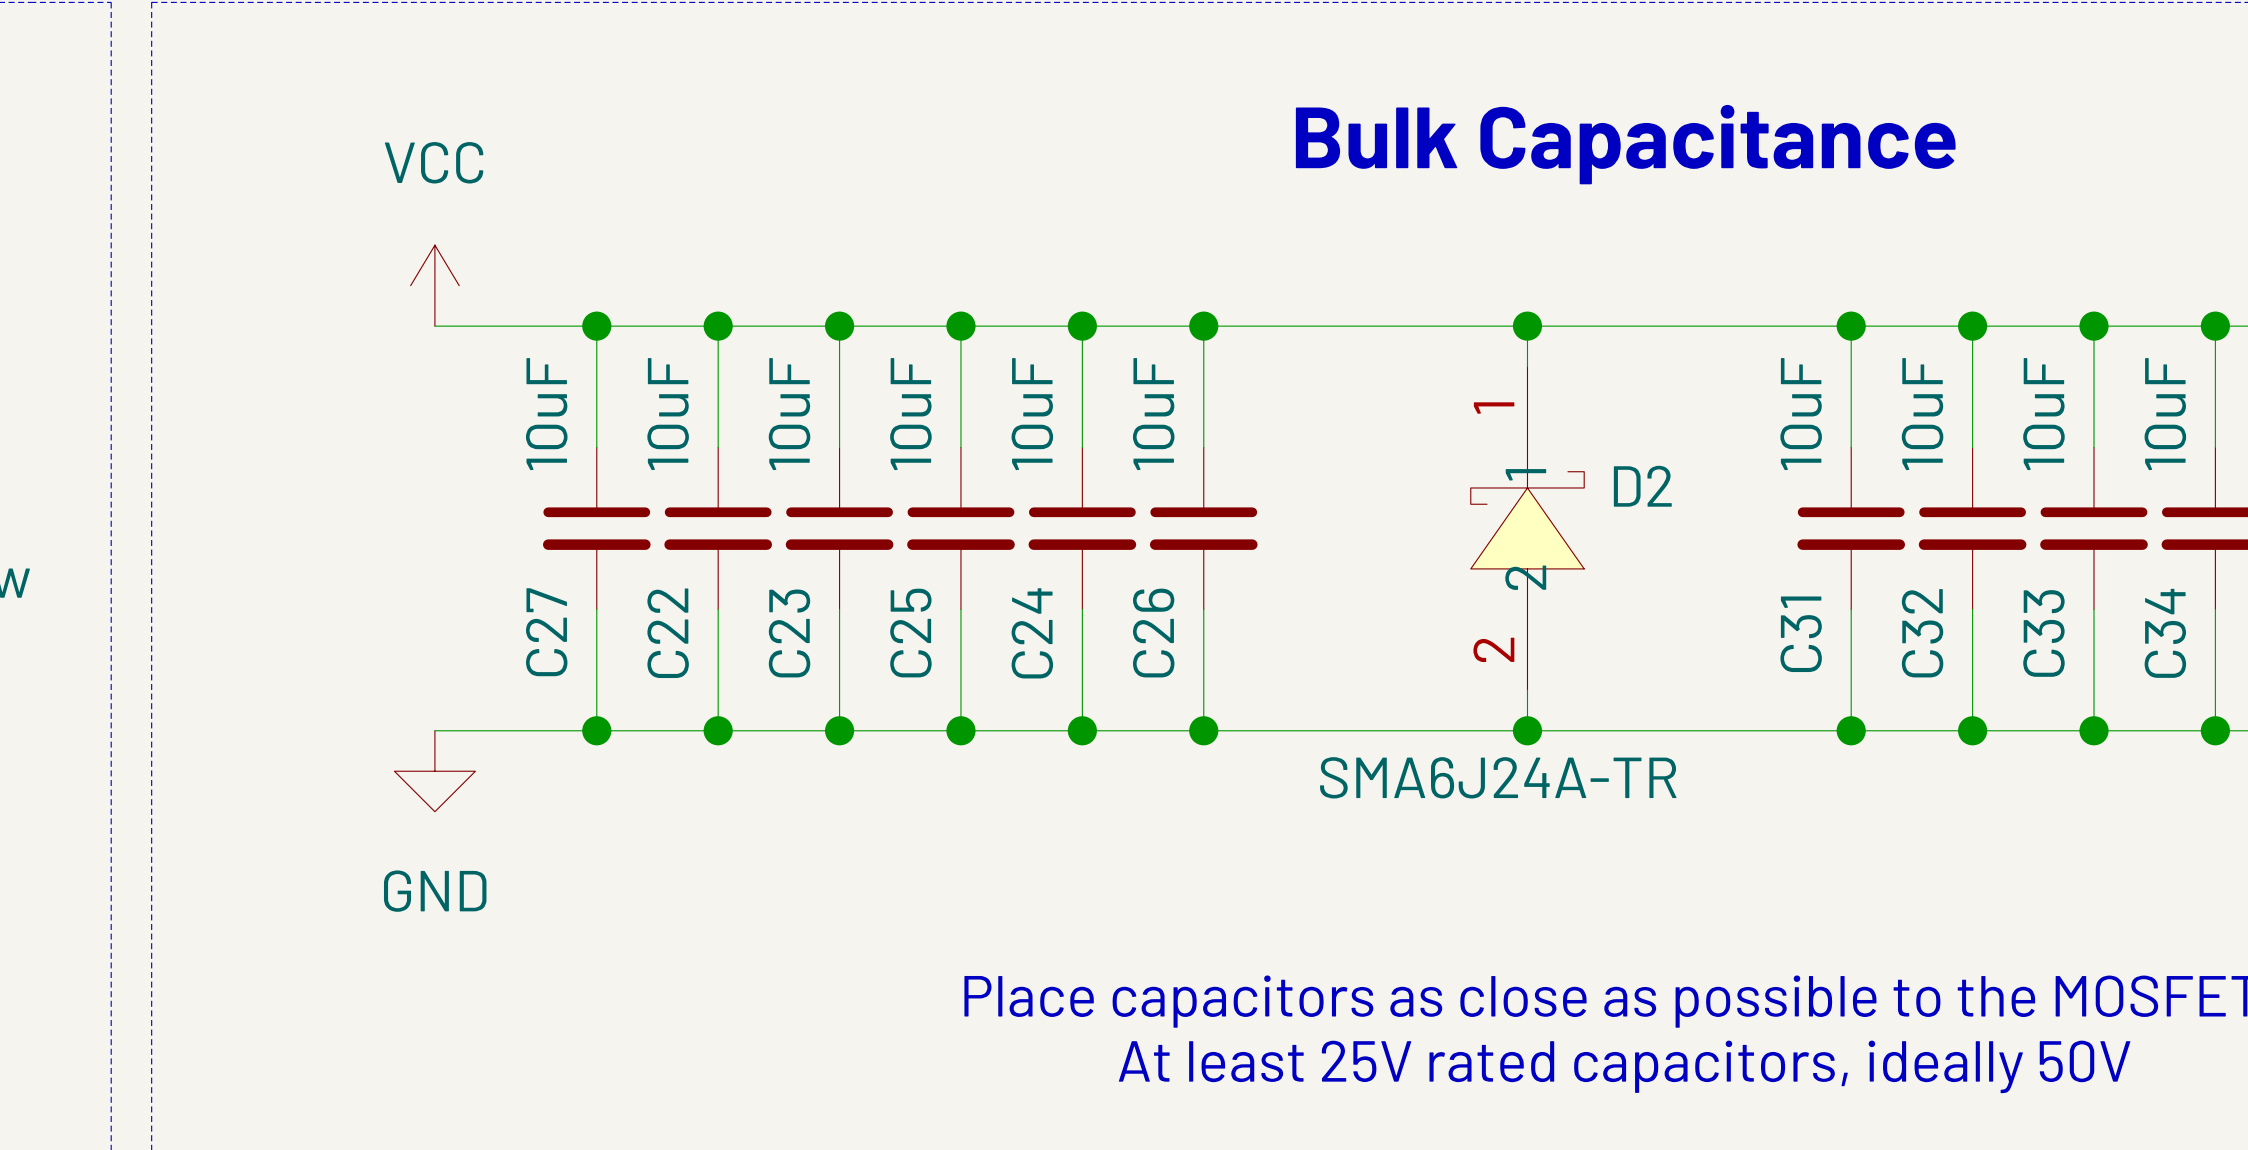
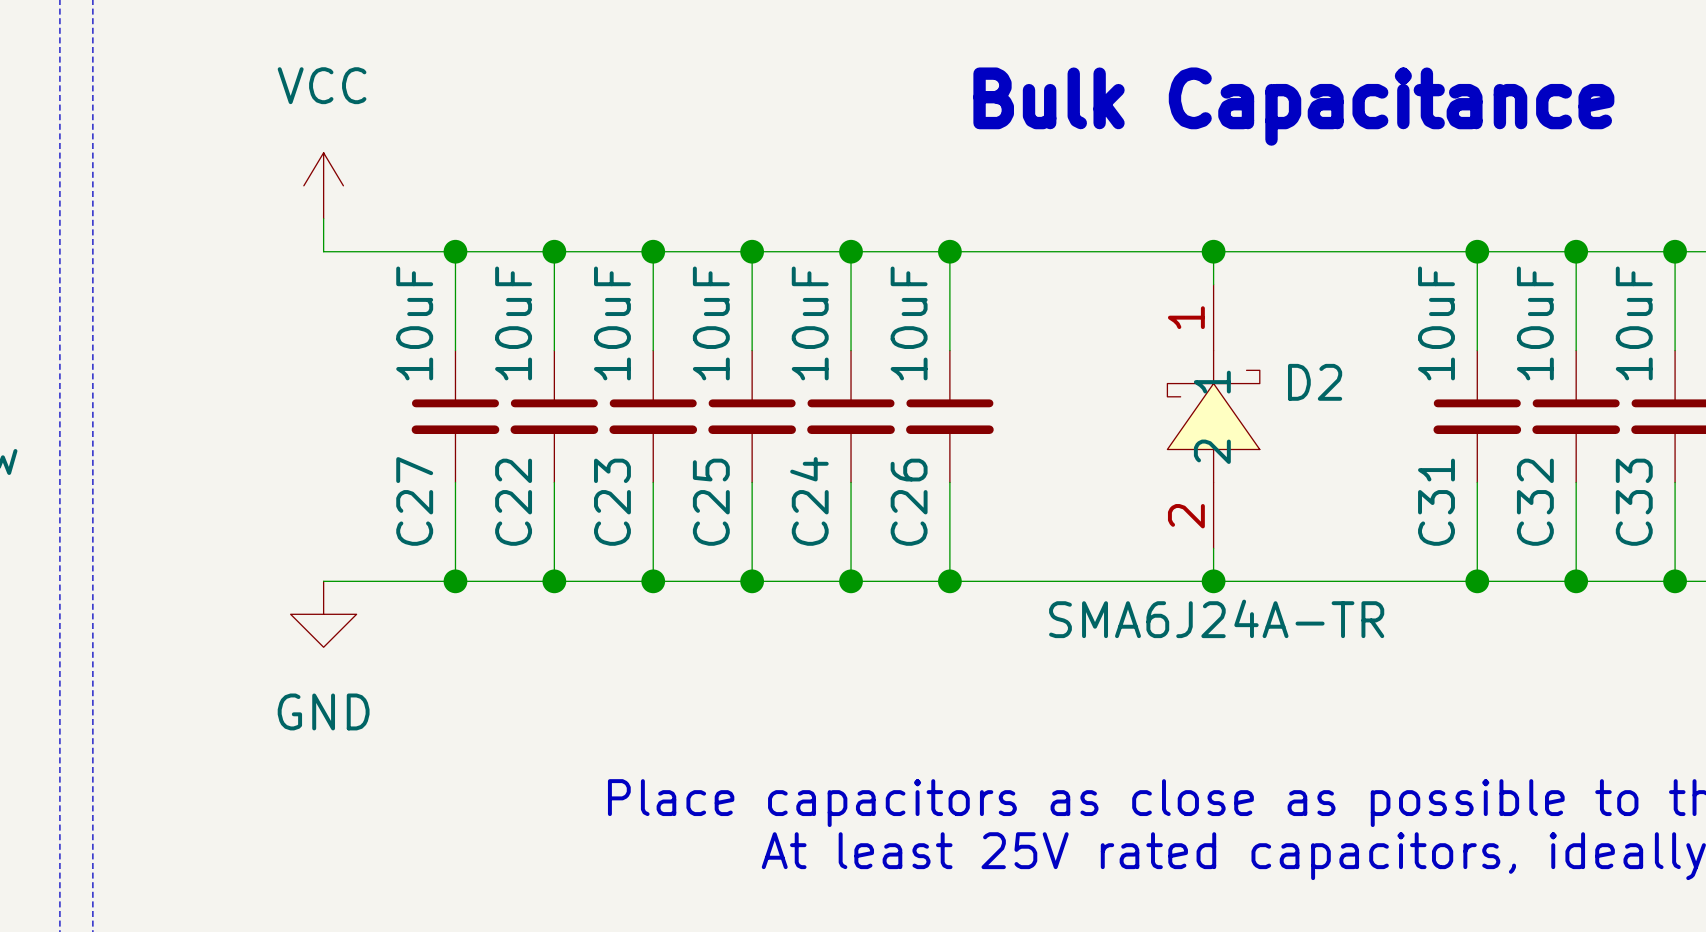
power symbol position: VCC (434, 285) -> VCC (323, 185)

